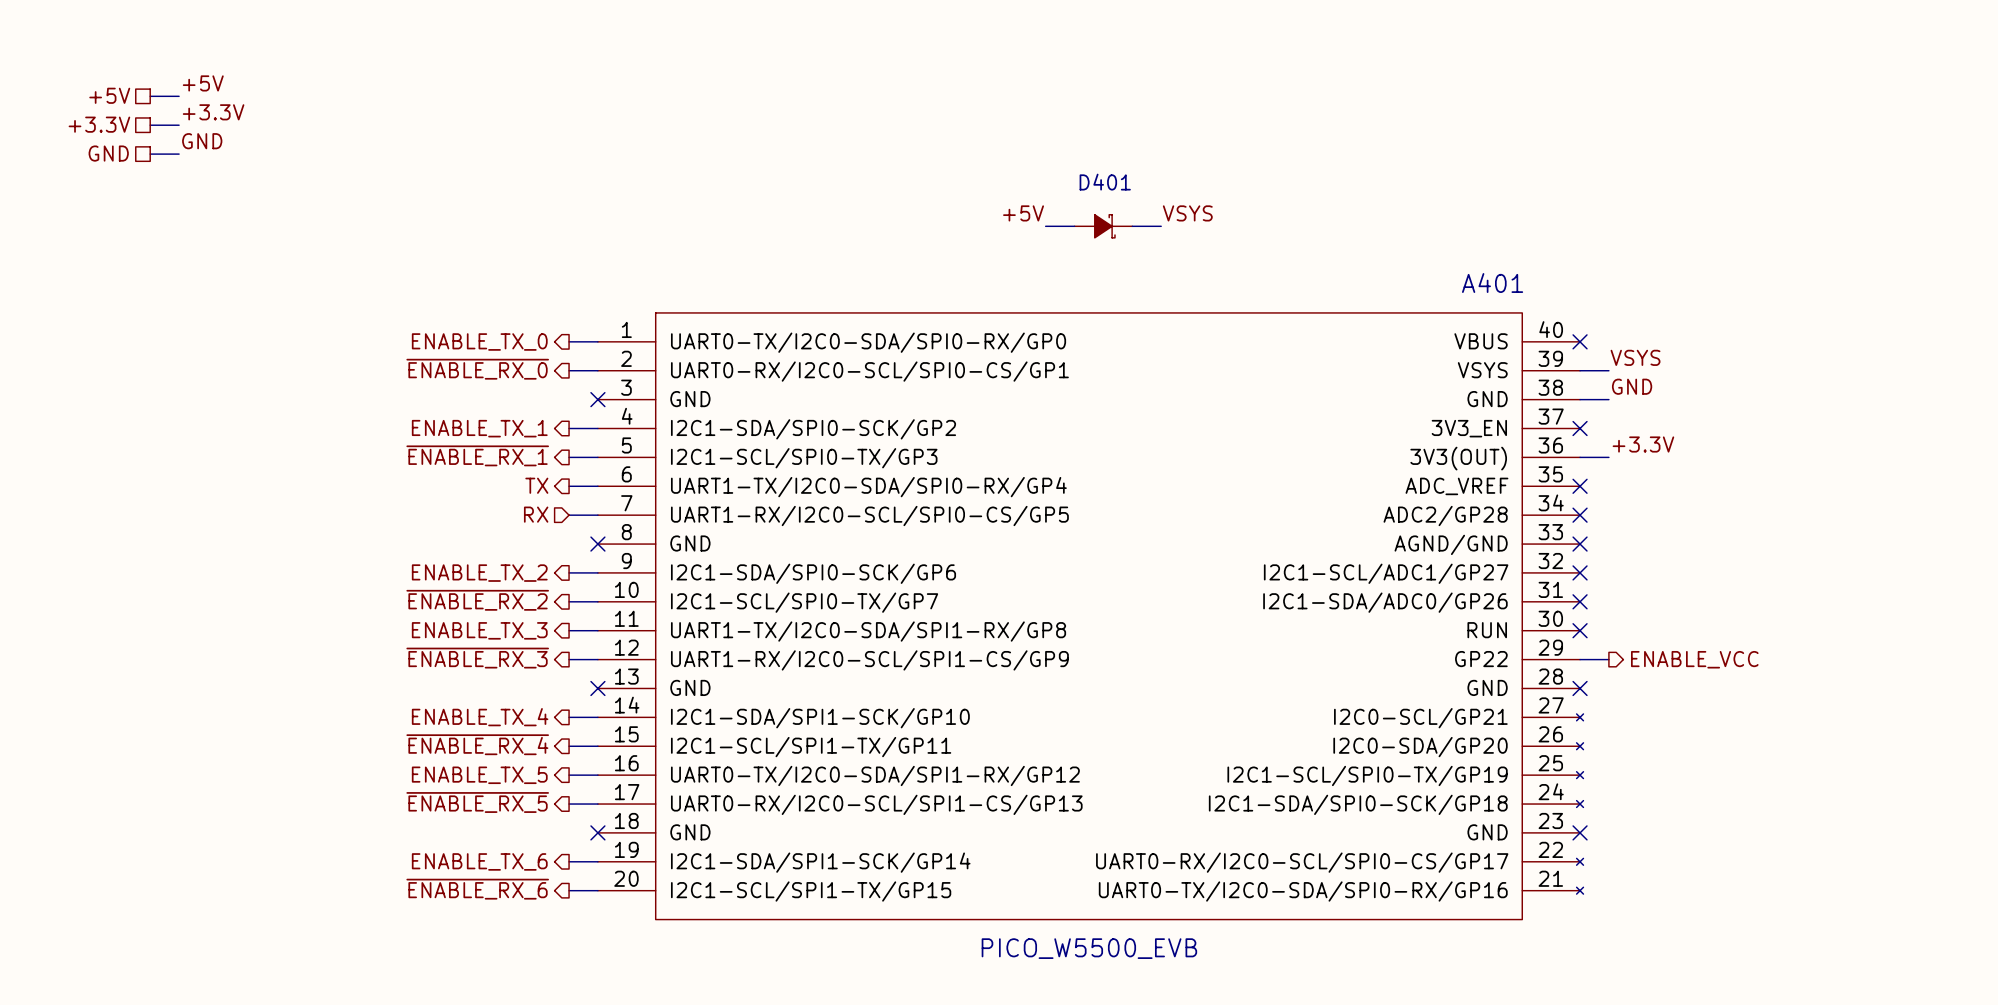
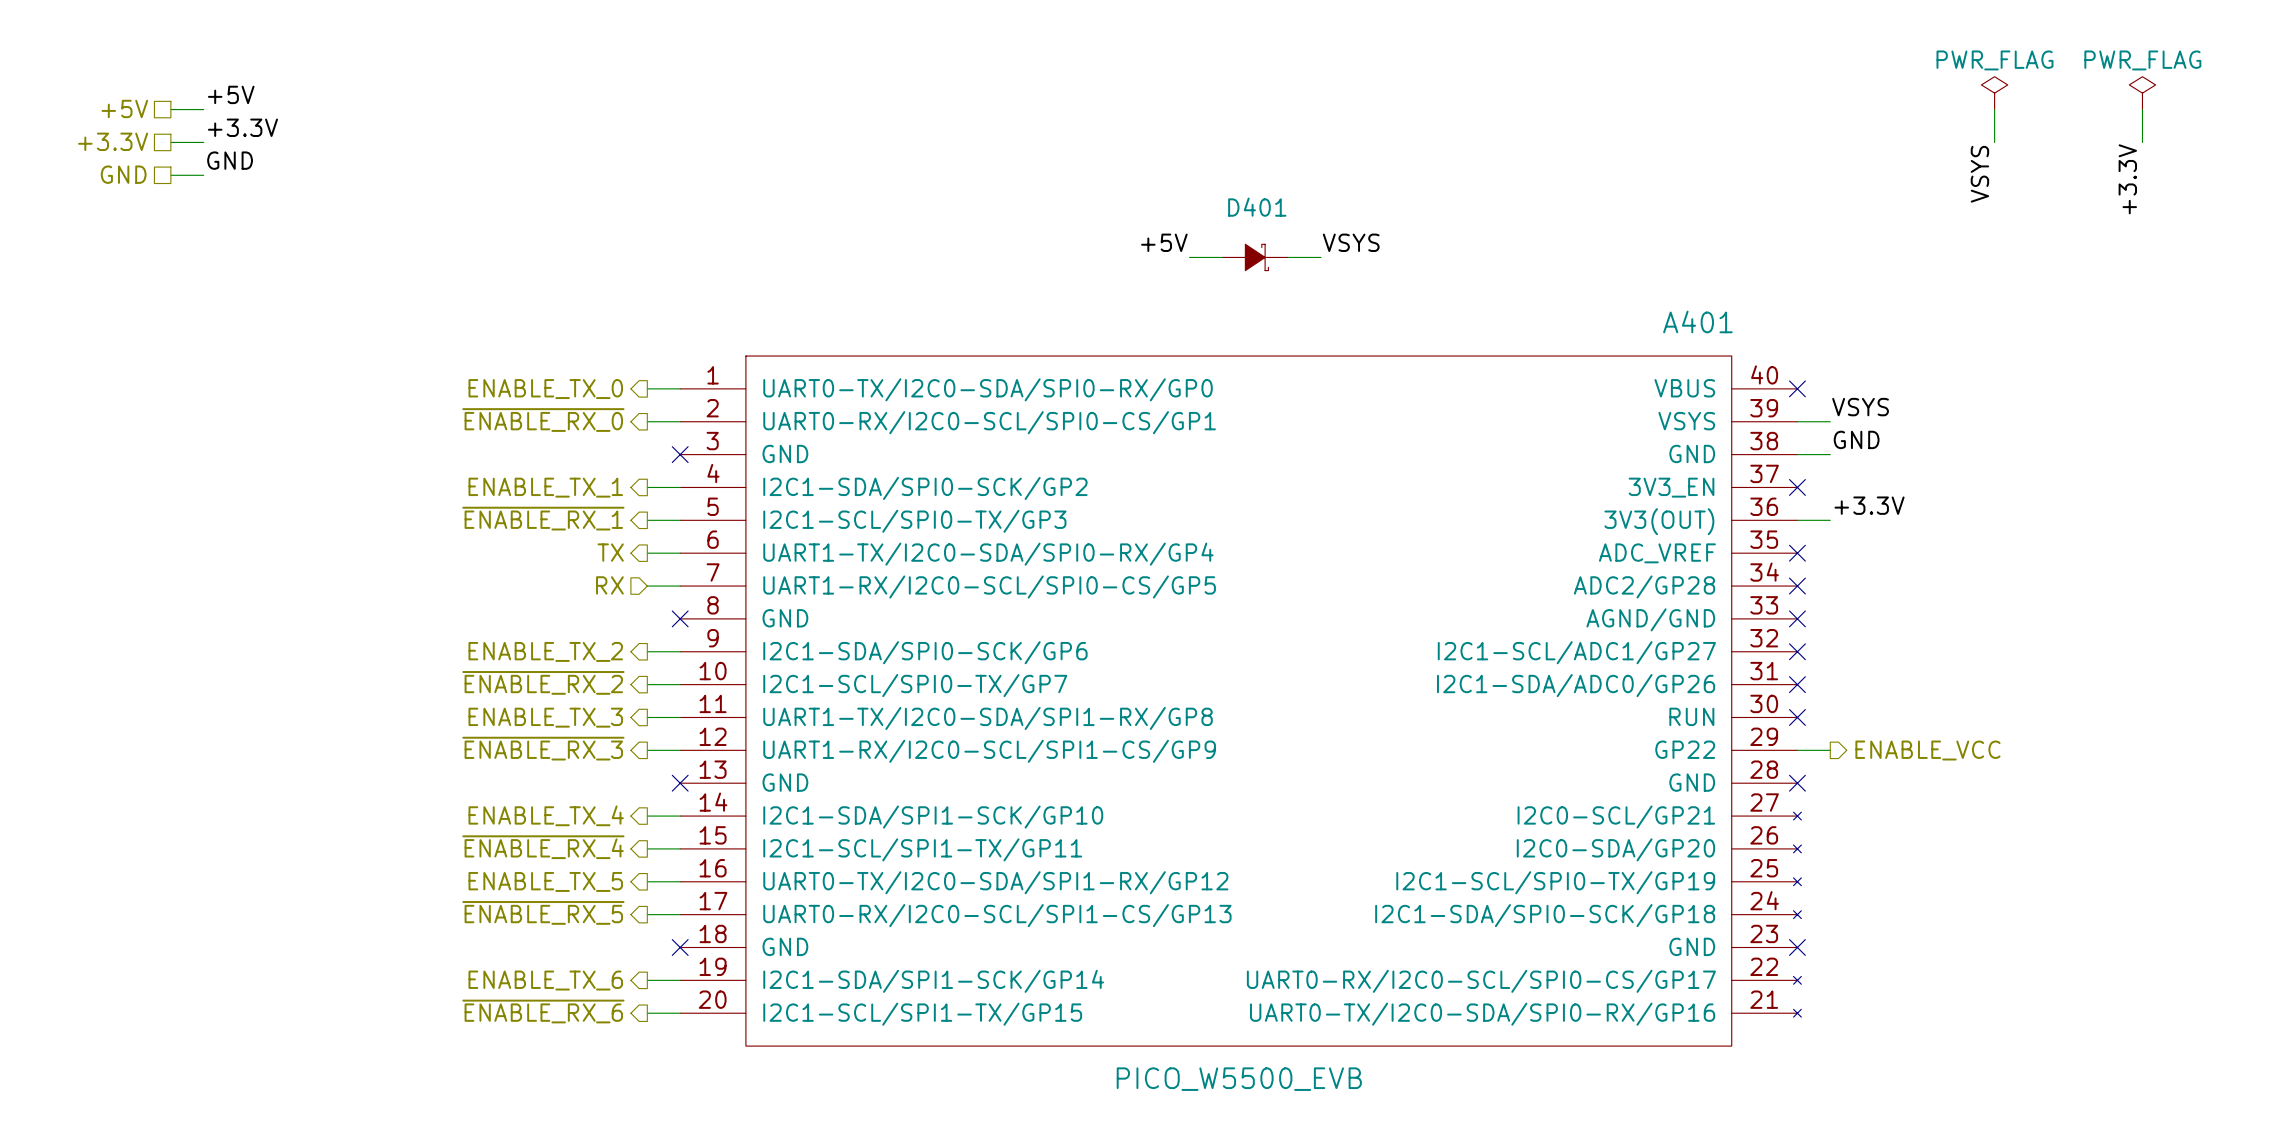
power symbol: none -> PWR_FLAG (1994, 93)
power symbol: none -> PWR_FLAG (2142, 93)
wire: none -> (1994, 109) (1994, 142)
wire: none -> (2142, 109) (2142, 142)
label: none -> VSYS (1979, 174)
label: none -> +3.3V (2127, 179)

